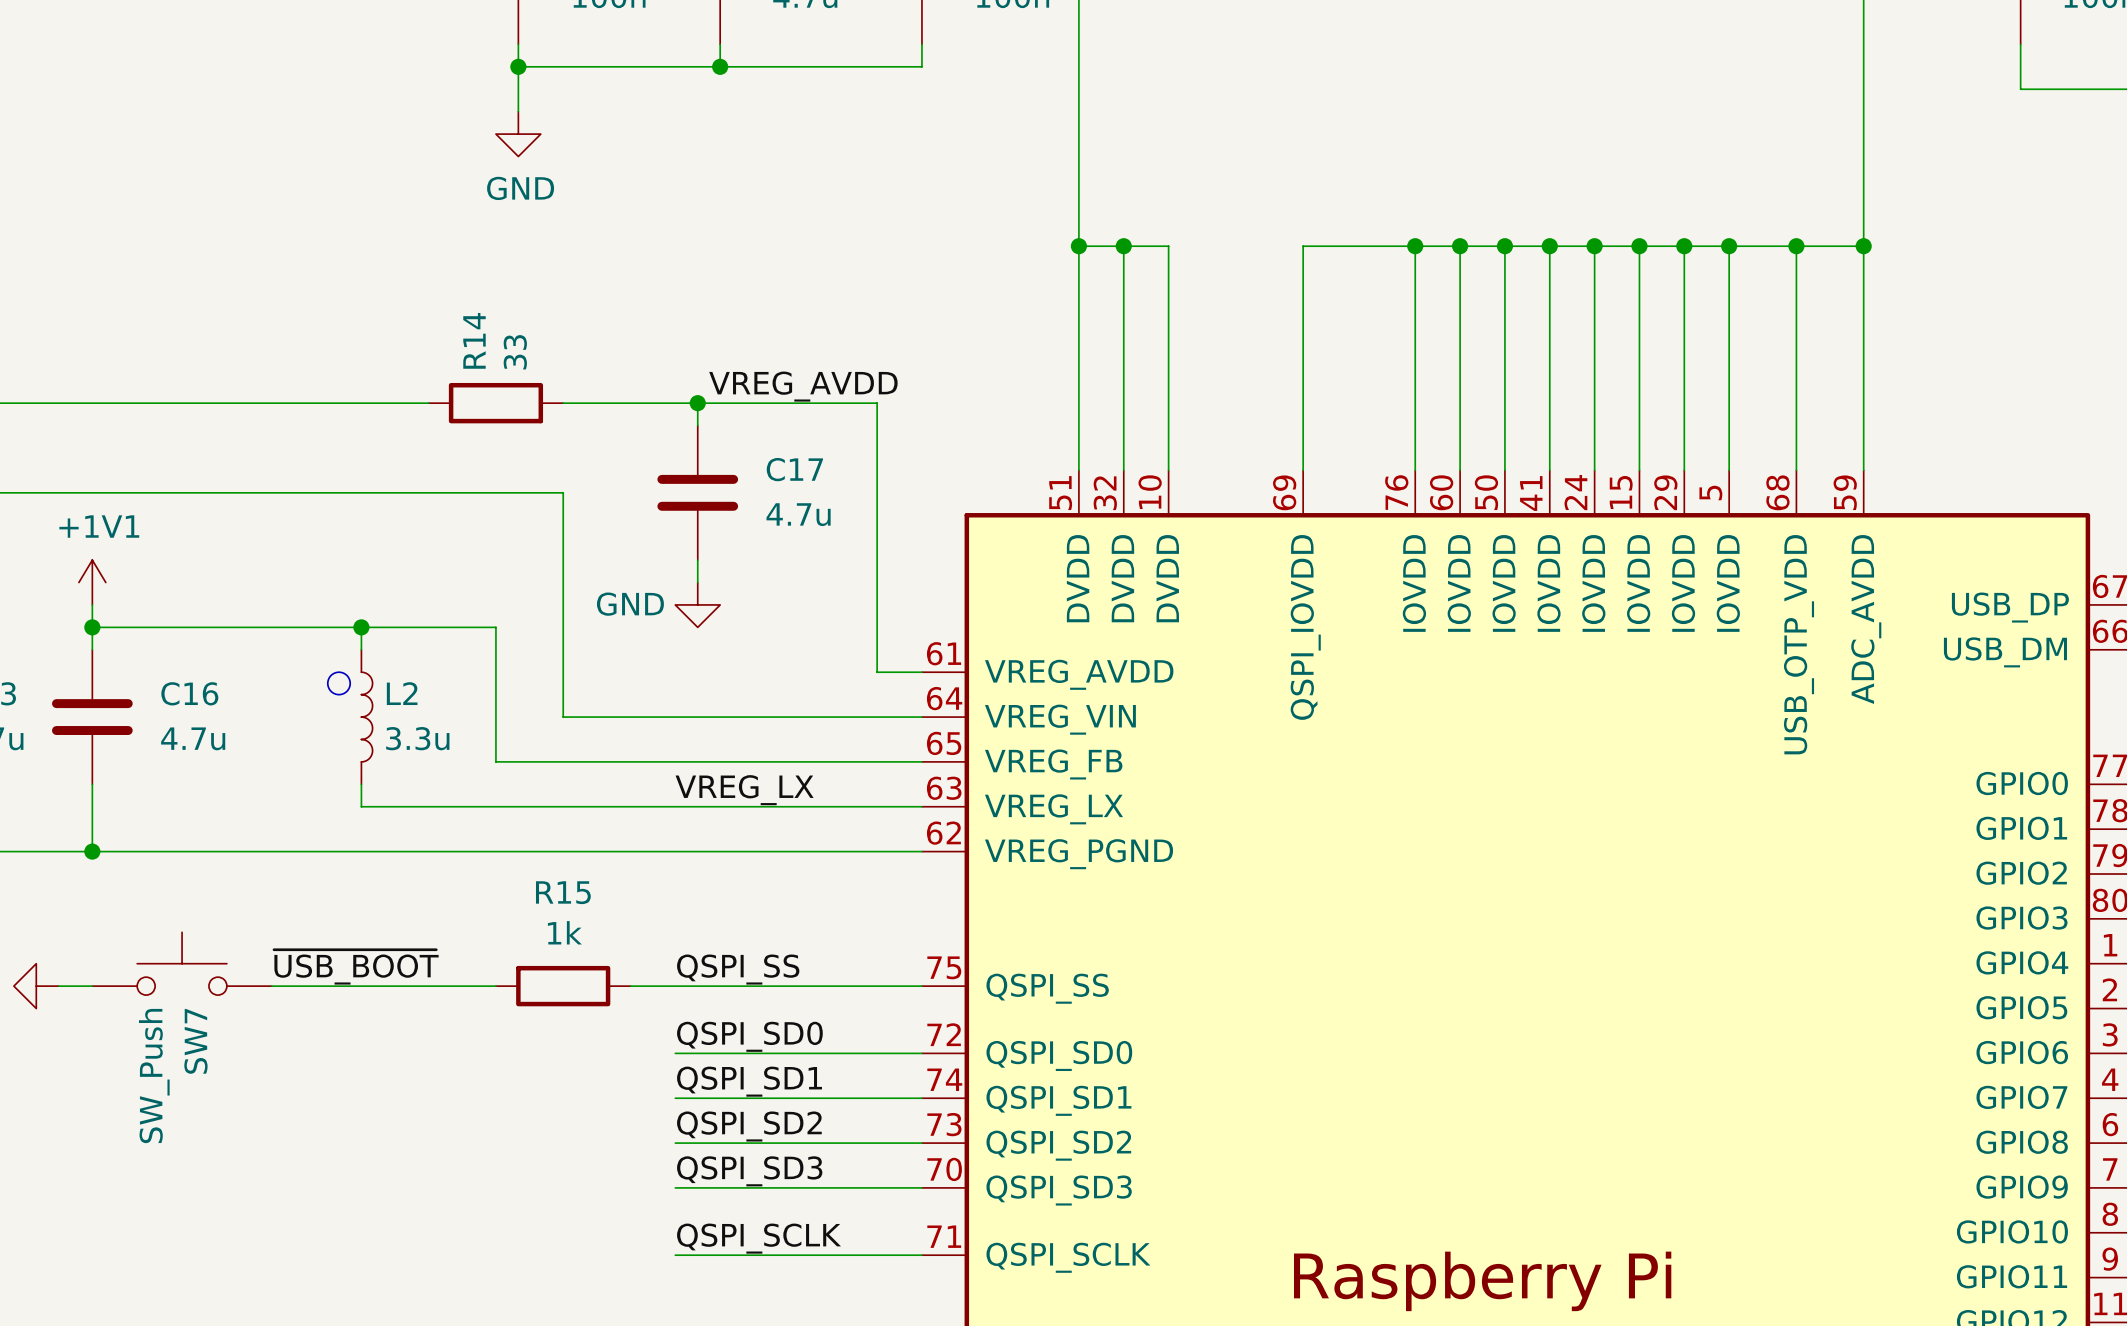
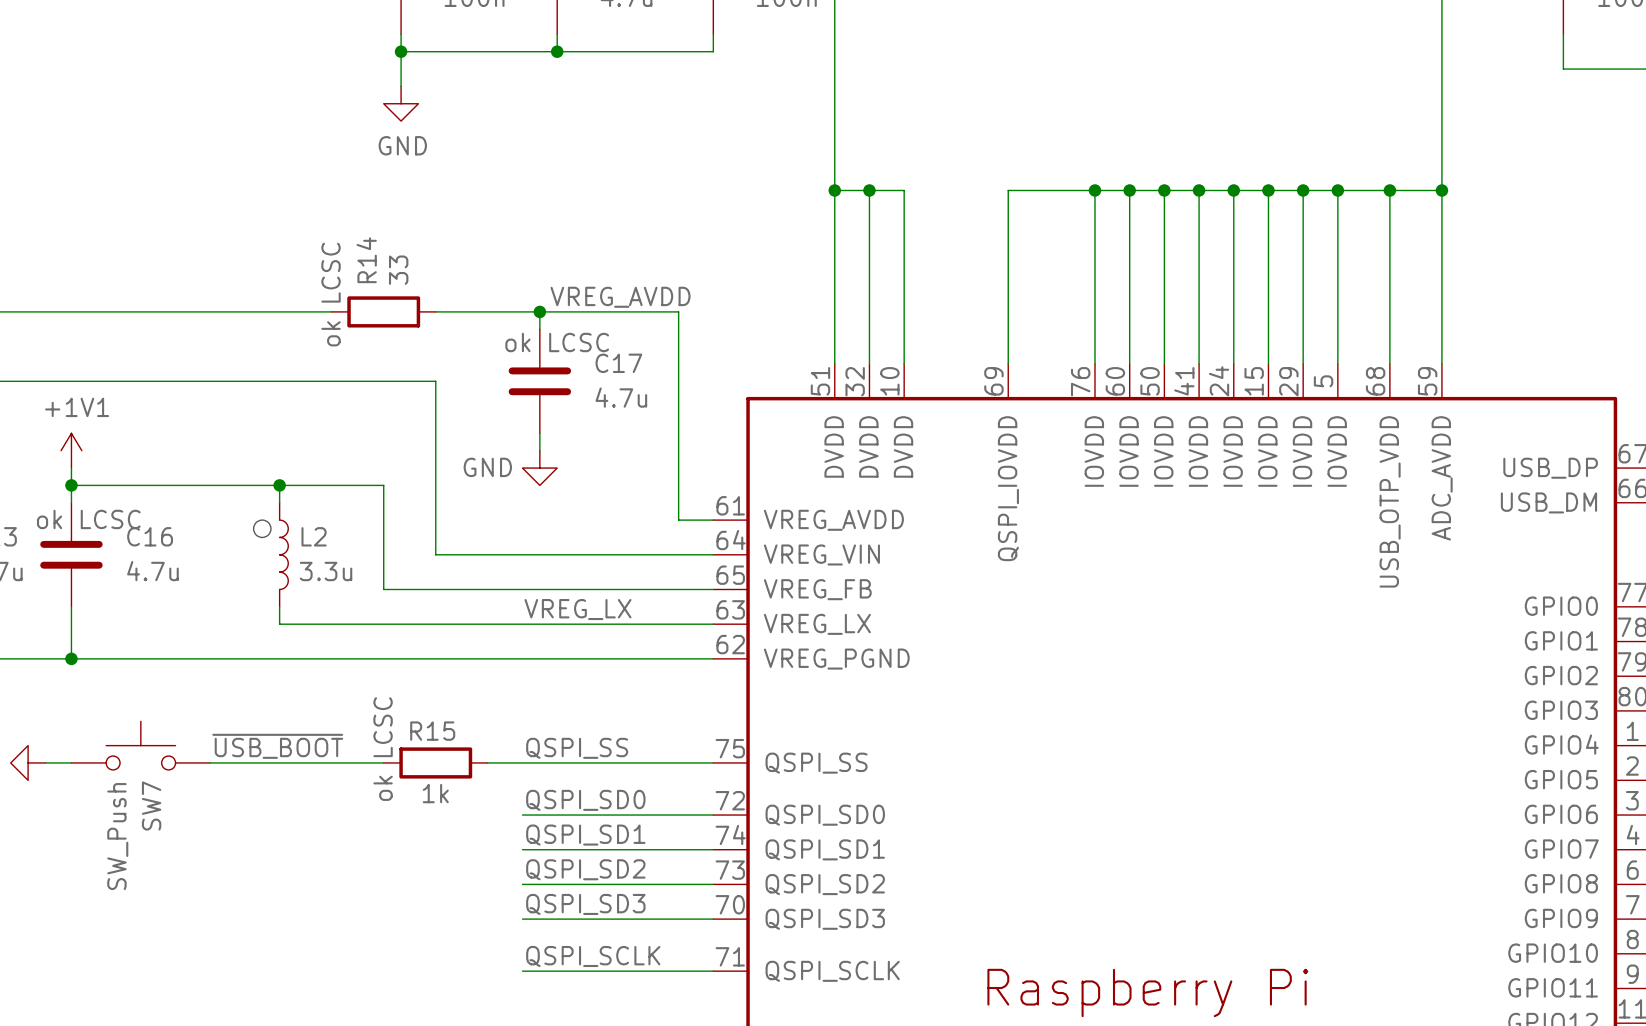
R14 text: none -> ok LCSC (331, 294)
C17 text: none -> ok LCSC (557, 342)
C16 text: none -> ok LCSC (88, 519)
R15 name position: R15 (563, 892) -> R15 (432, 731)
R15 value position: 1k (564, 932) -> 1k (435, 793)
R15 text: none -> ok LCSC (383, 749)

